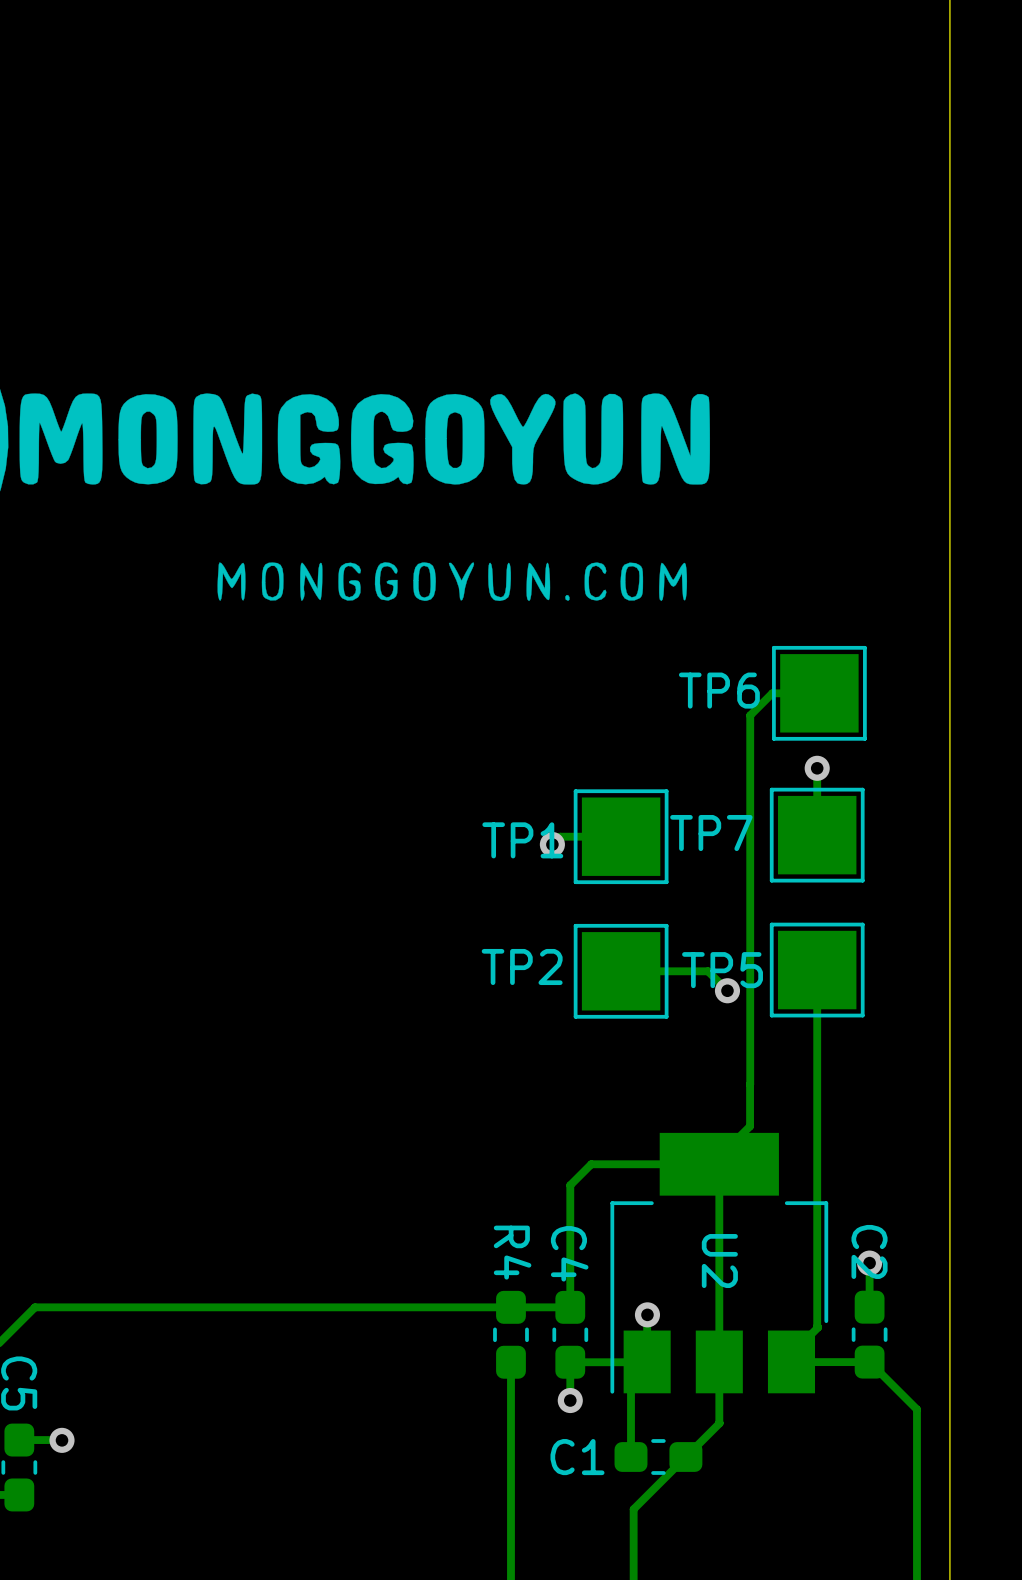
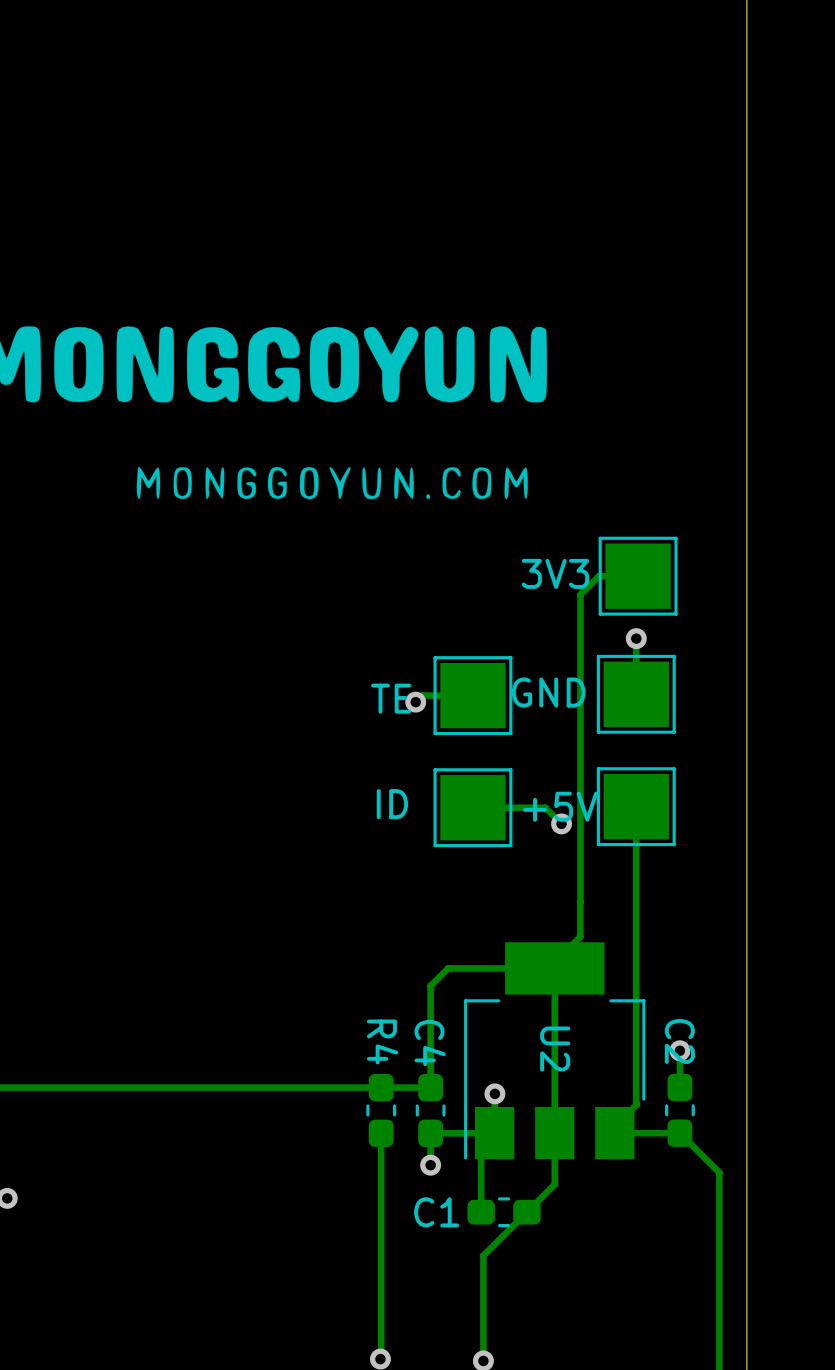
TP6 name: TP6 (719, 690) -> 3V3 (555, 573)
TP7 name: TP7 (711, 833) -> GND (548, 692)
TP1 name: TP1 (522, 840) -> TE (391, 698)
TP2 name: TP2 (522, 966) -> ID (392, 804)
TP5 name: TP5 (722, 970) -> +5V (560, 806)

